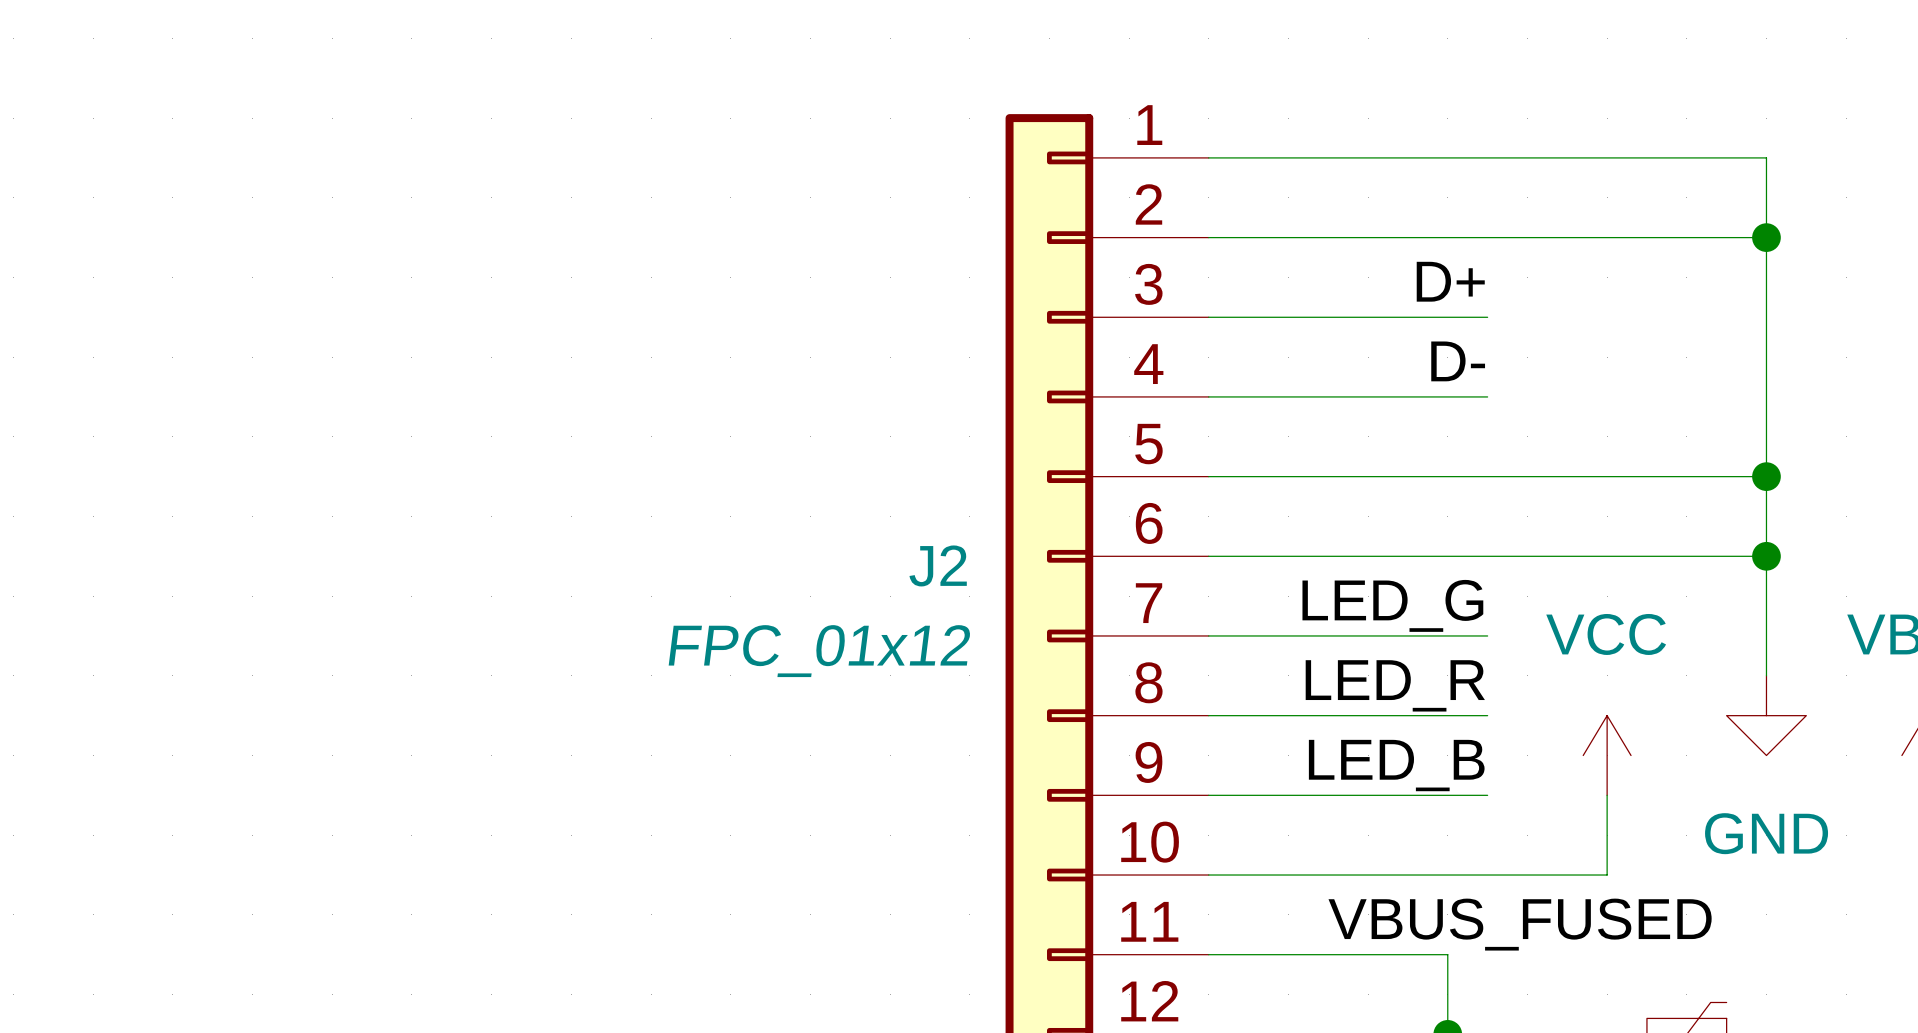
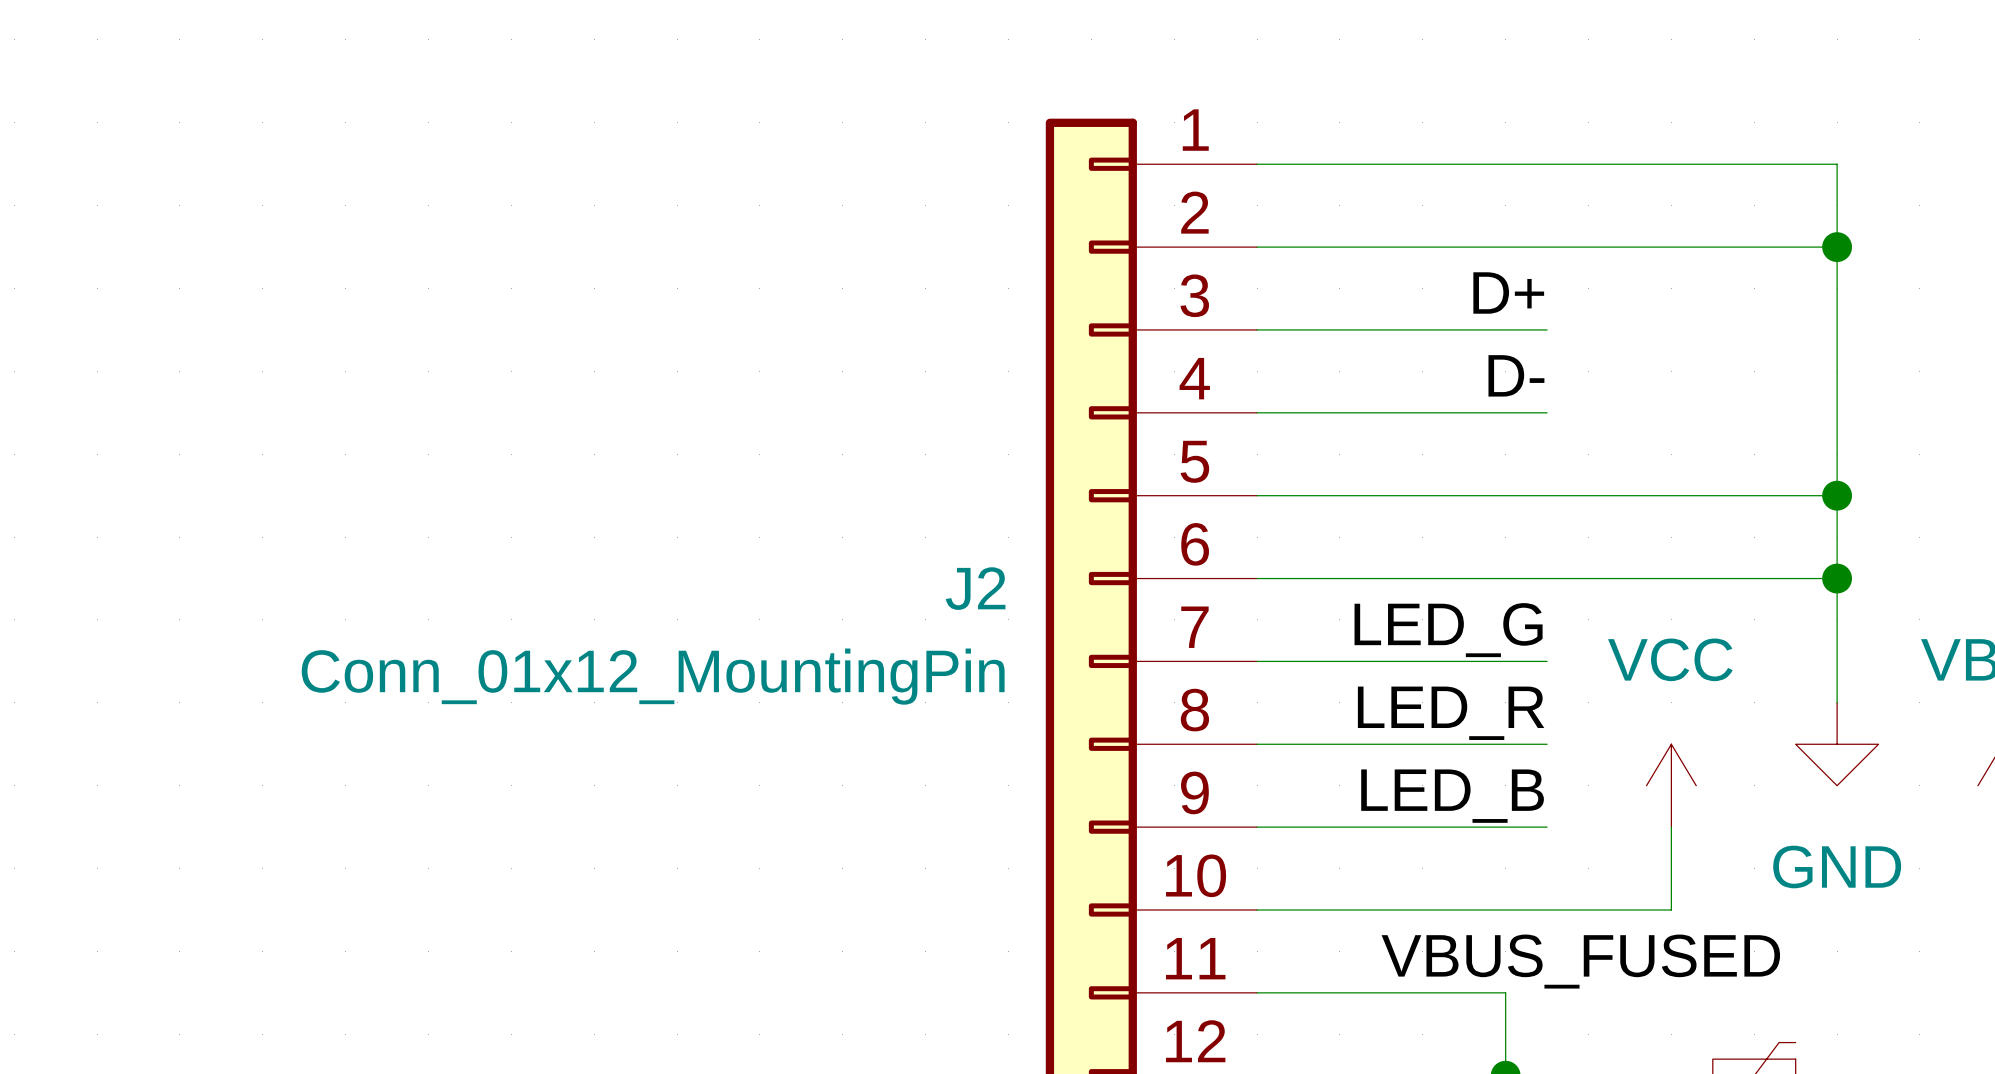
J2 value: FPC_01x12 (819, 651) -> Conn_01x12_MountingPin (653, 676)

